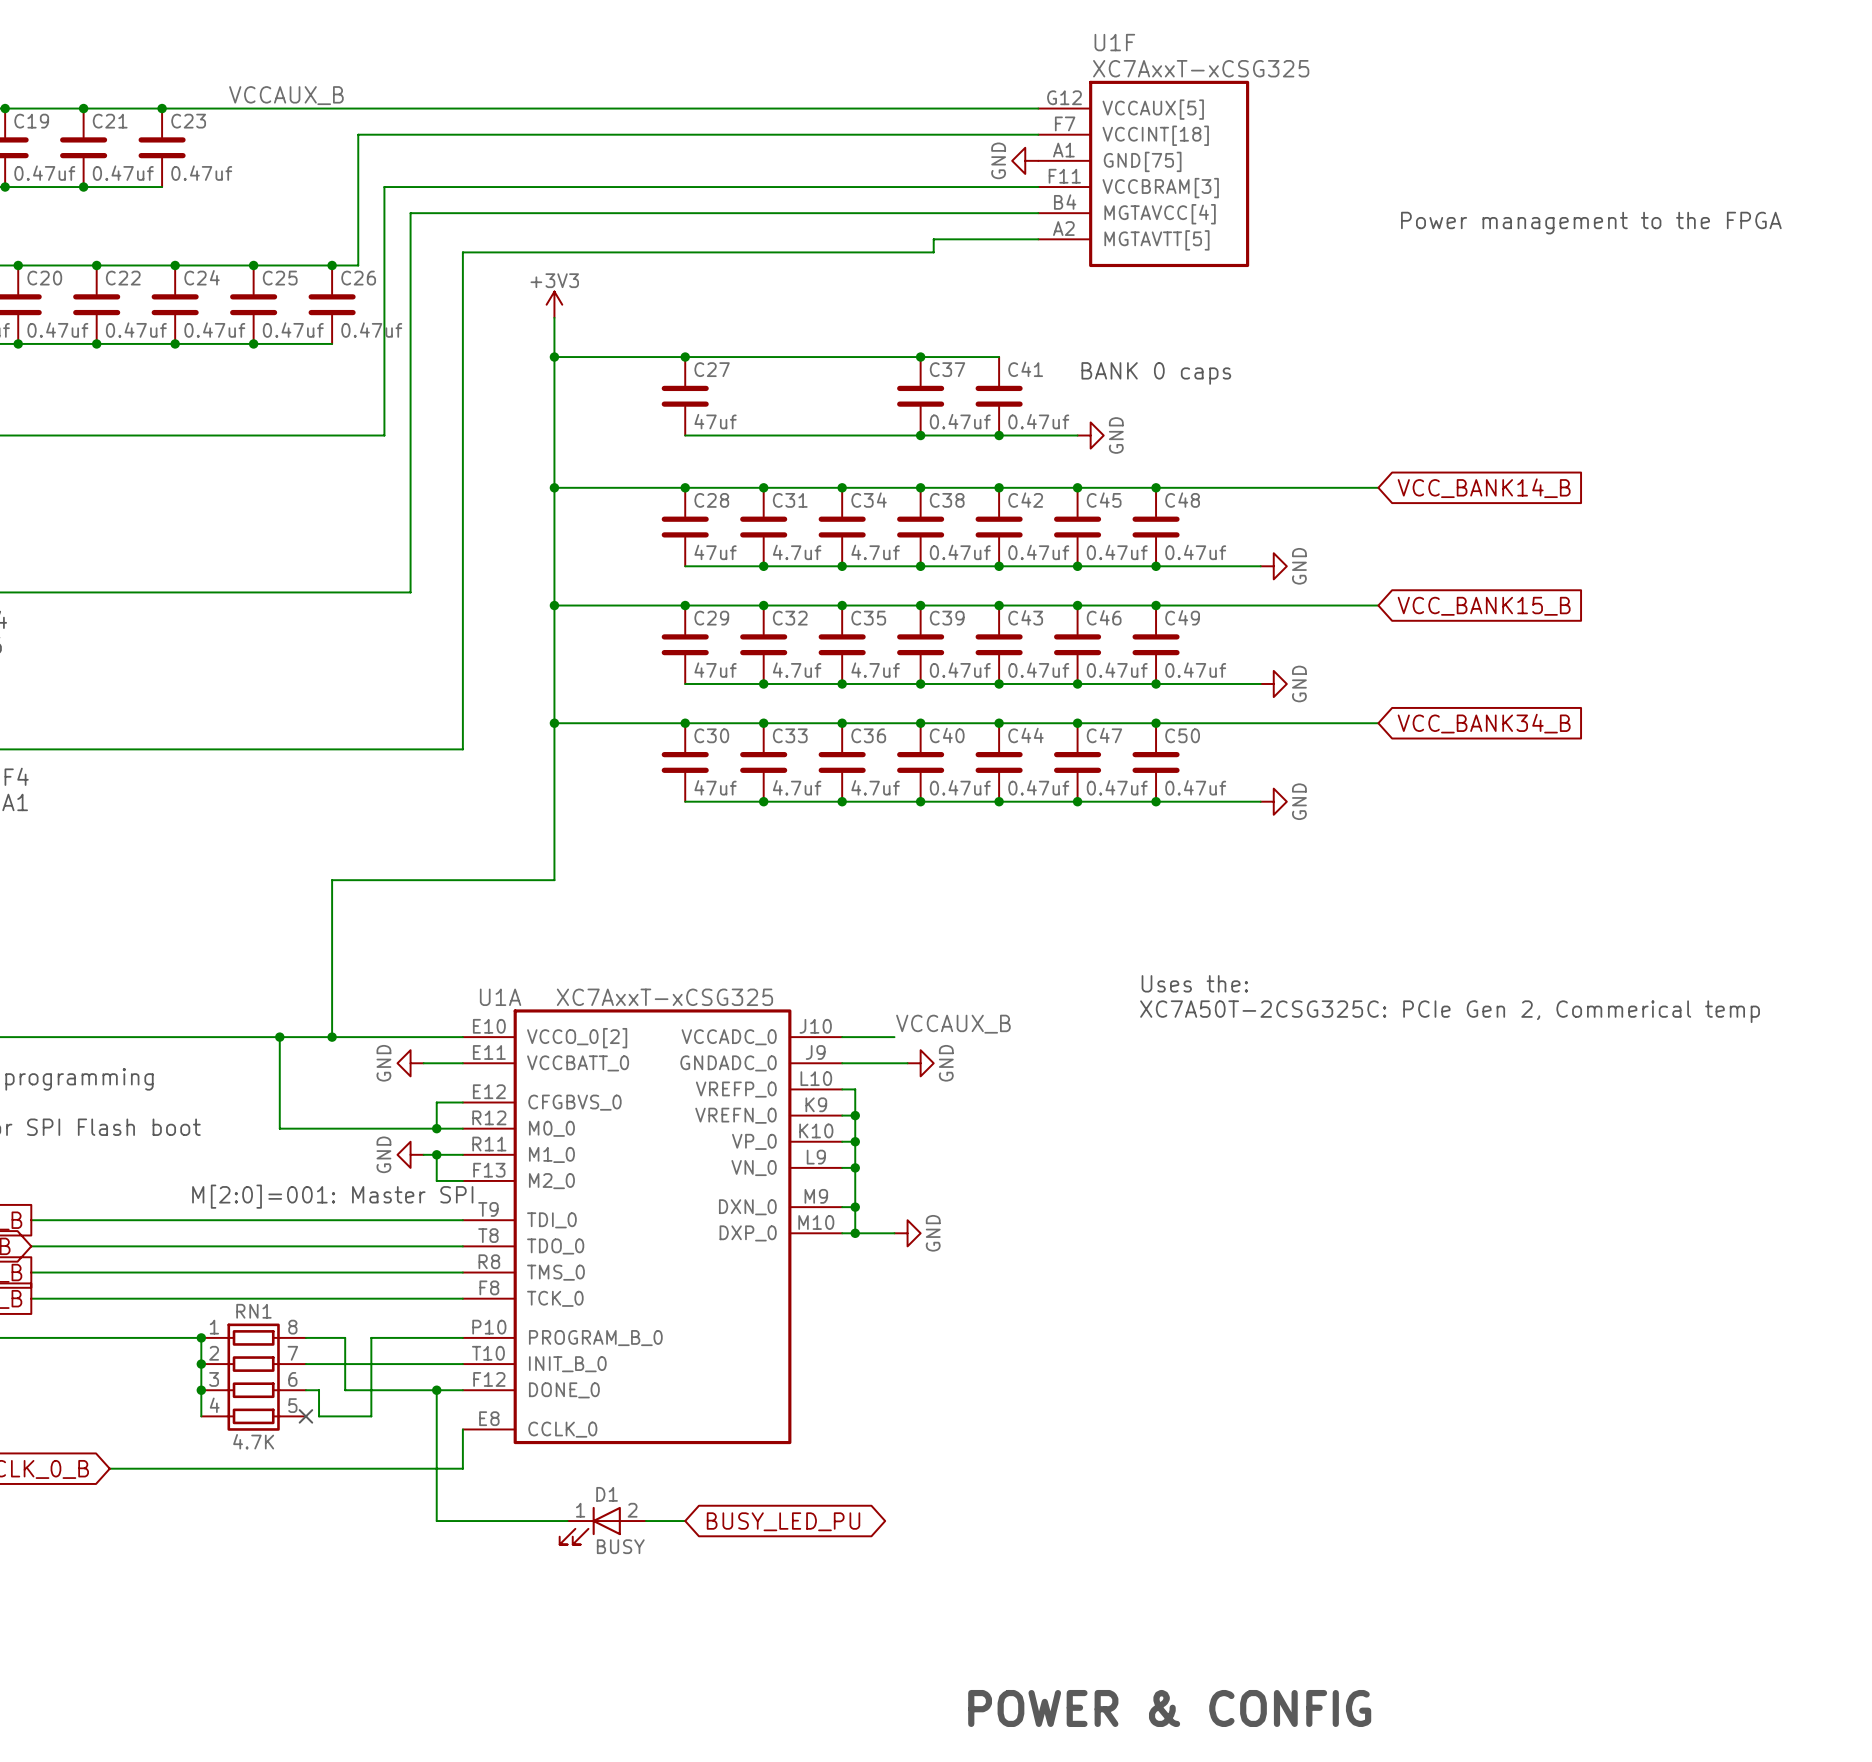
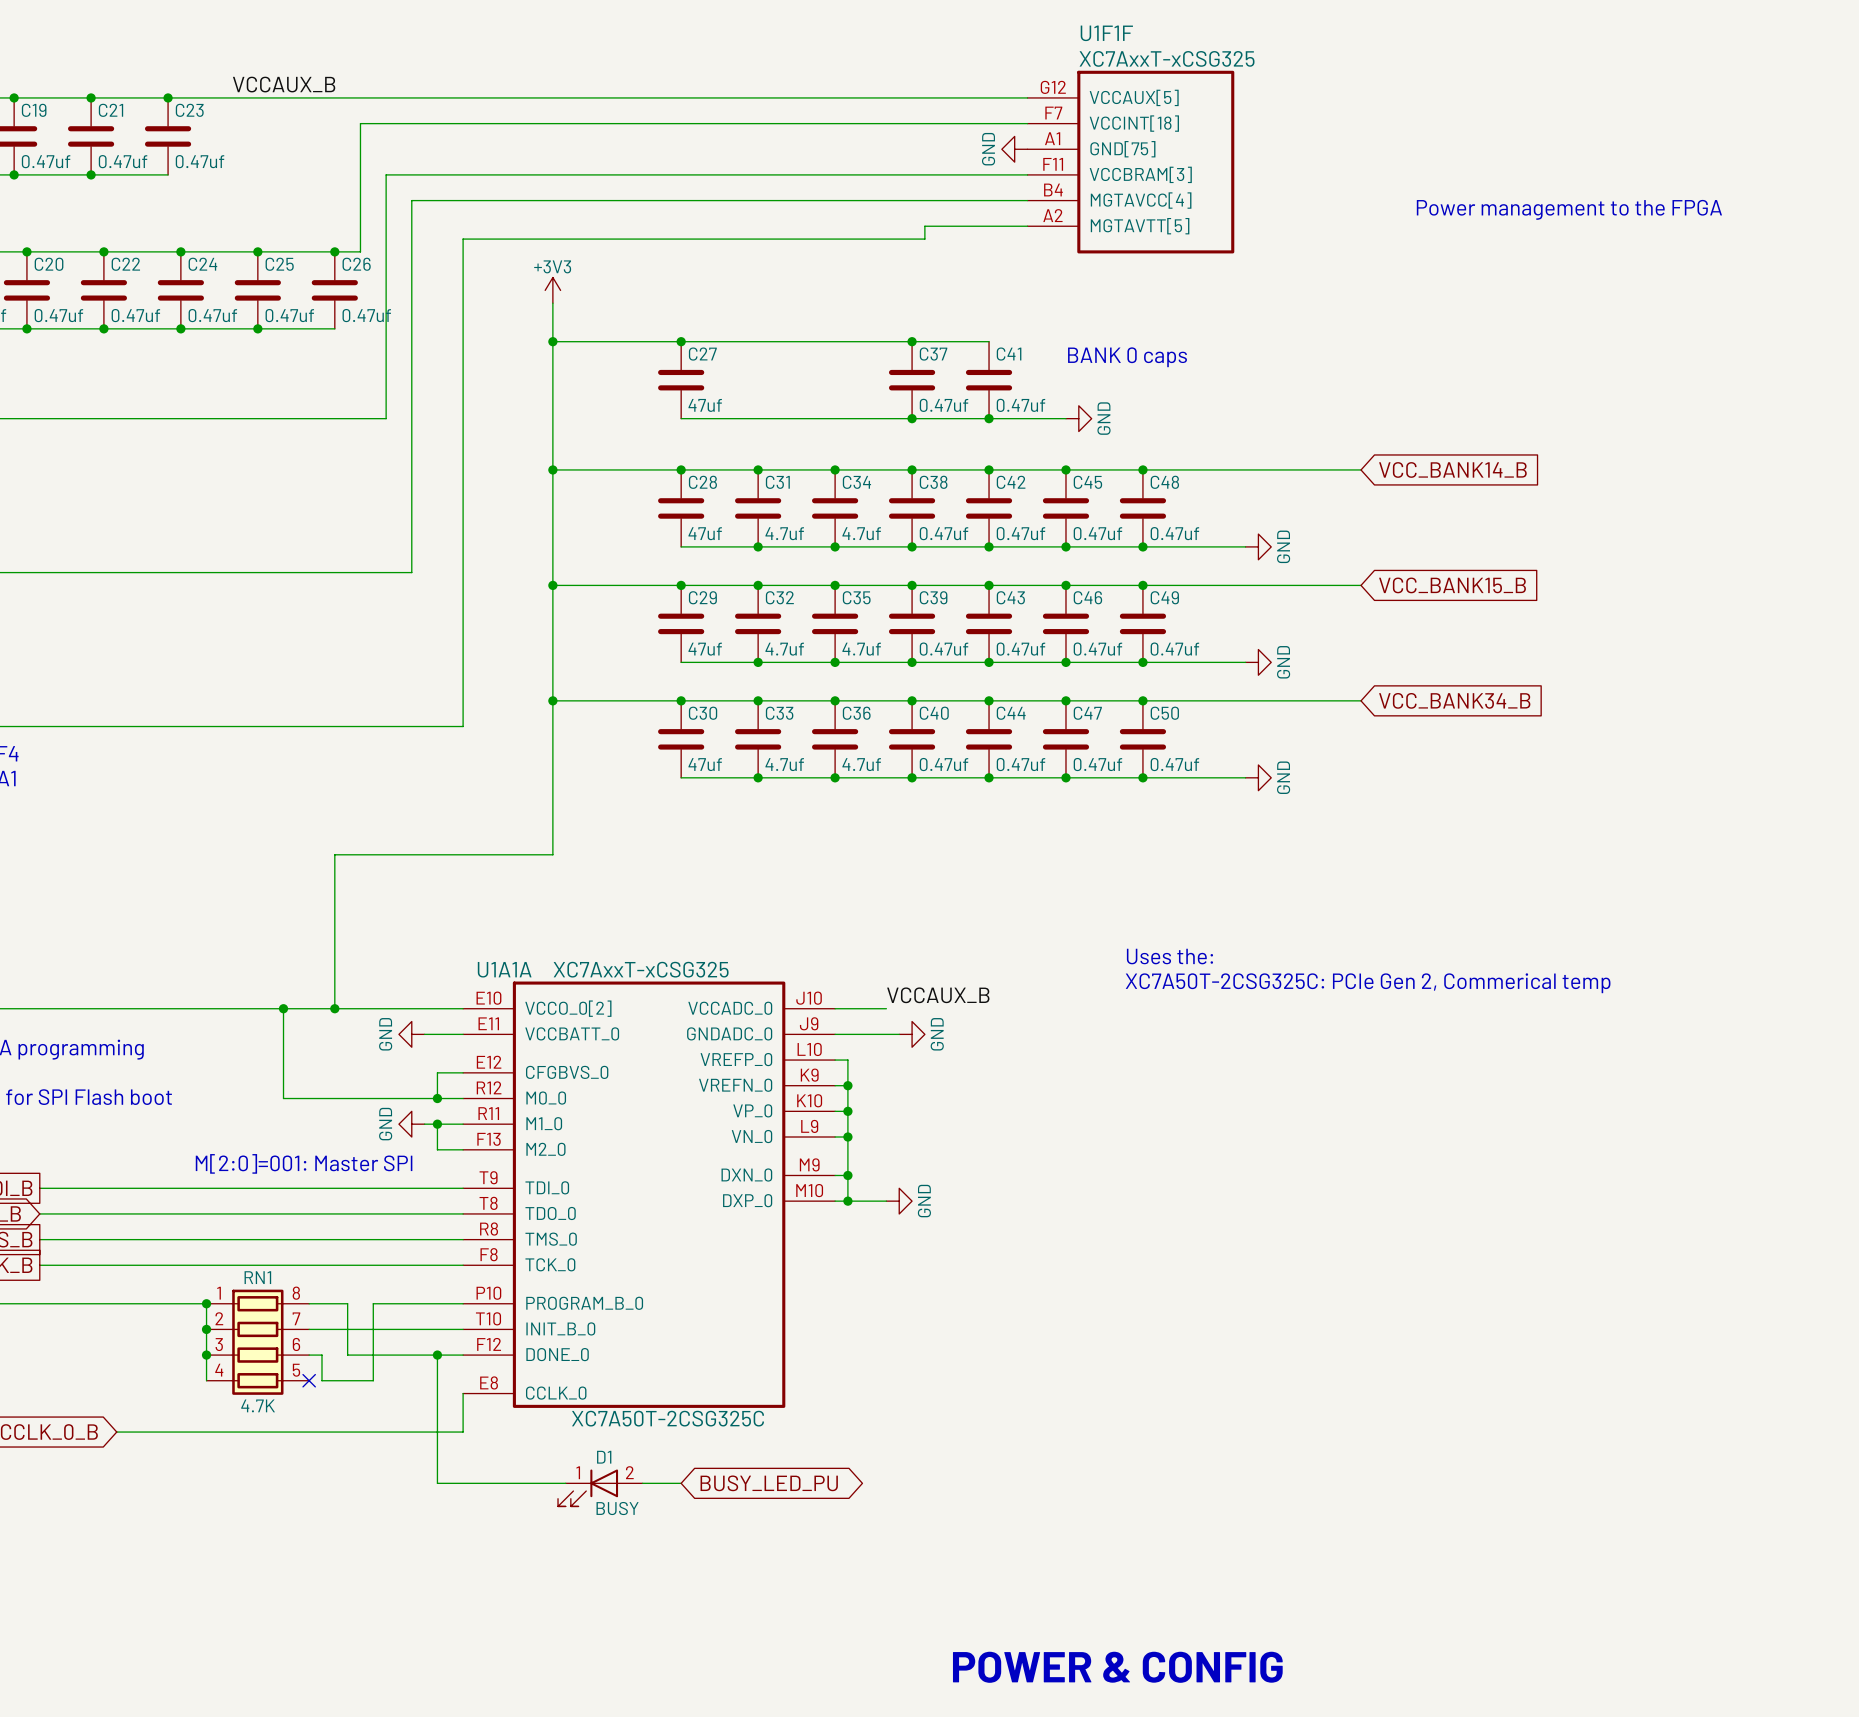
U1F name: U1F (1114, 42) -> U1F1F (1106, 33)
U1A name: U1A (500, 997) -> U1A1A (504, 969)
U1A text: none -> XC7A50T-2CSG325C (668, 1418)

